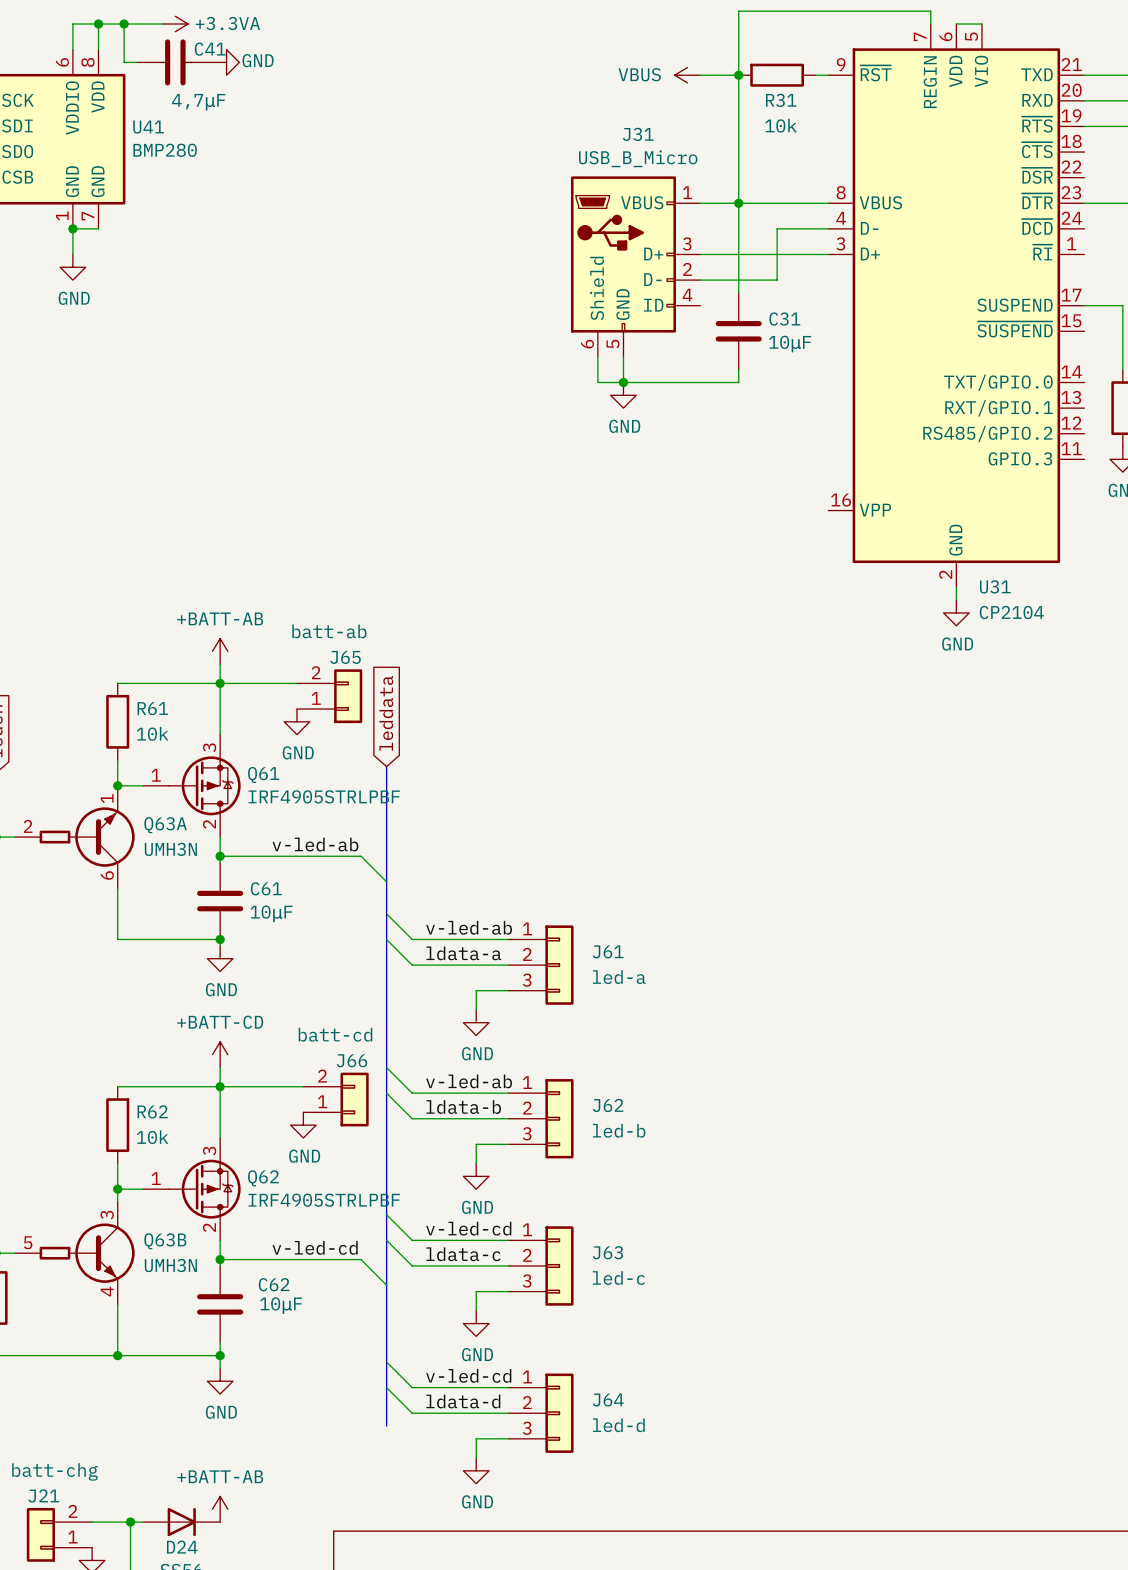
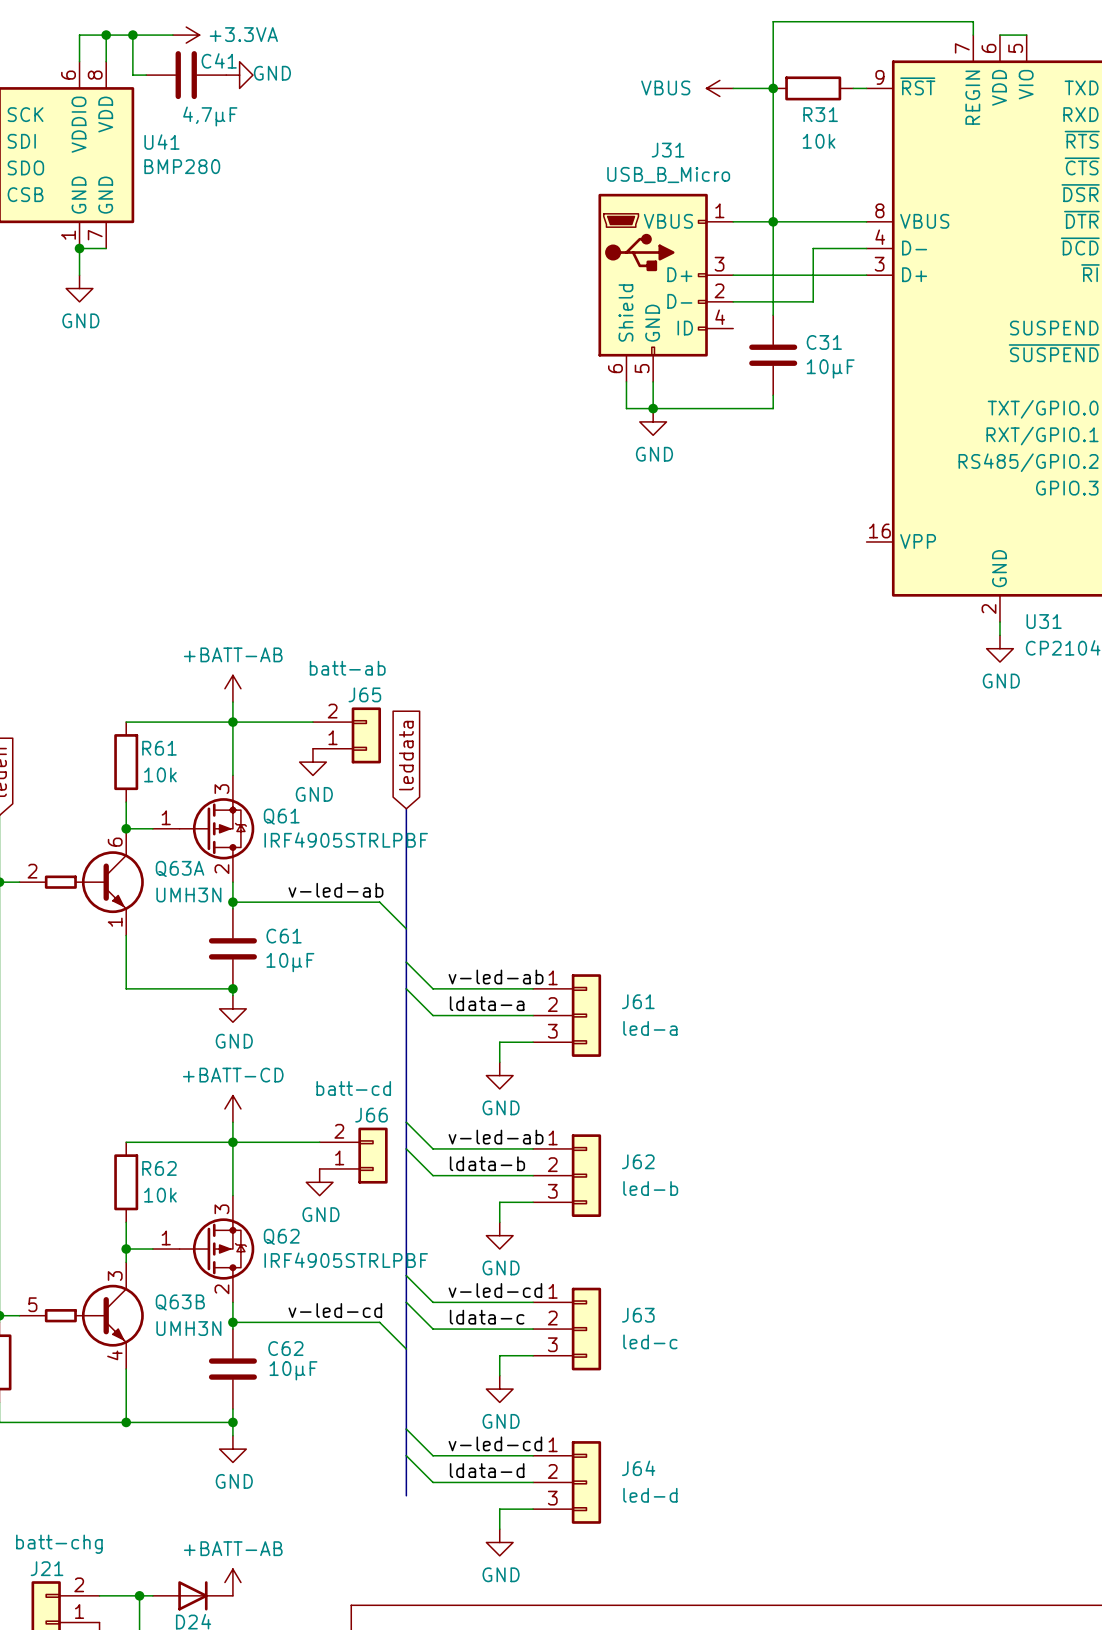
Q63A flip: as is (87, 837) -> up-down (94, 882)

